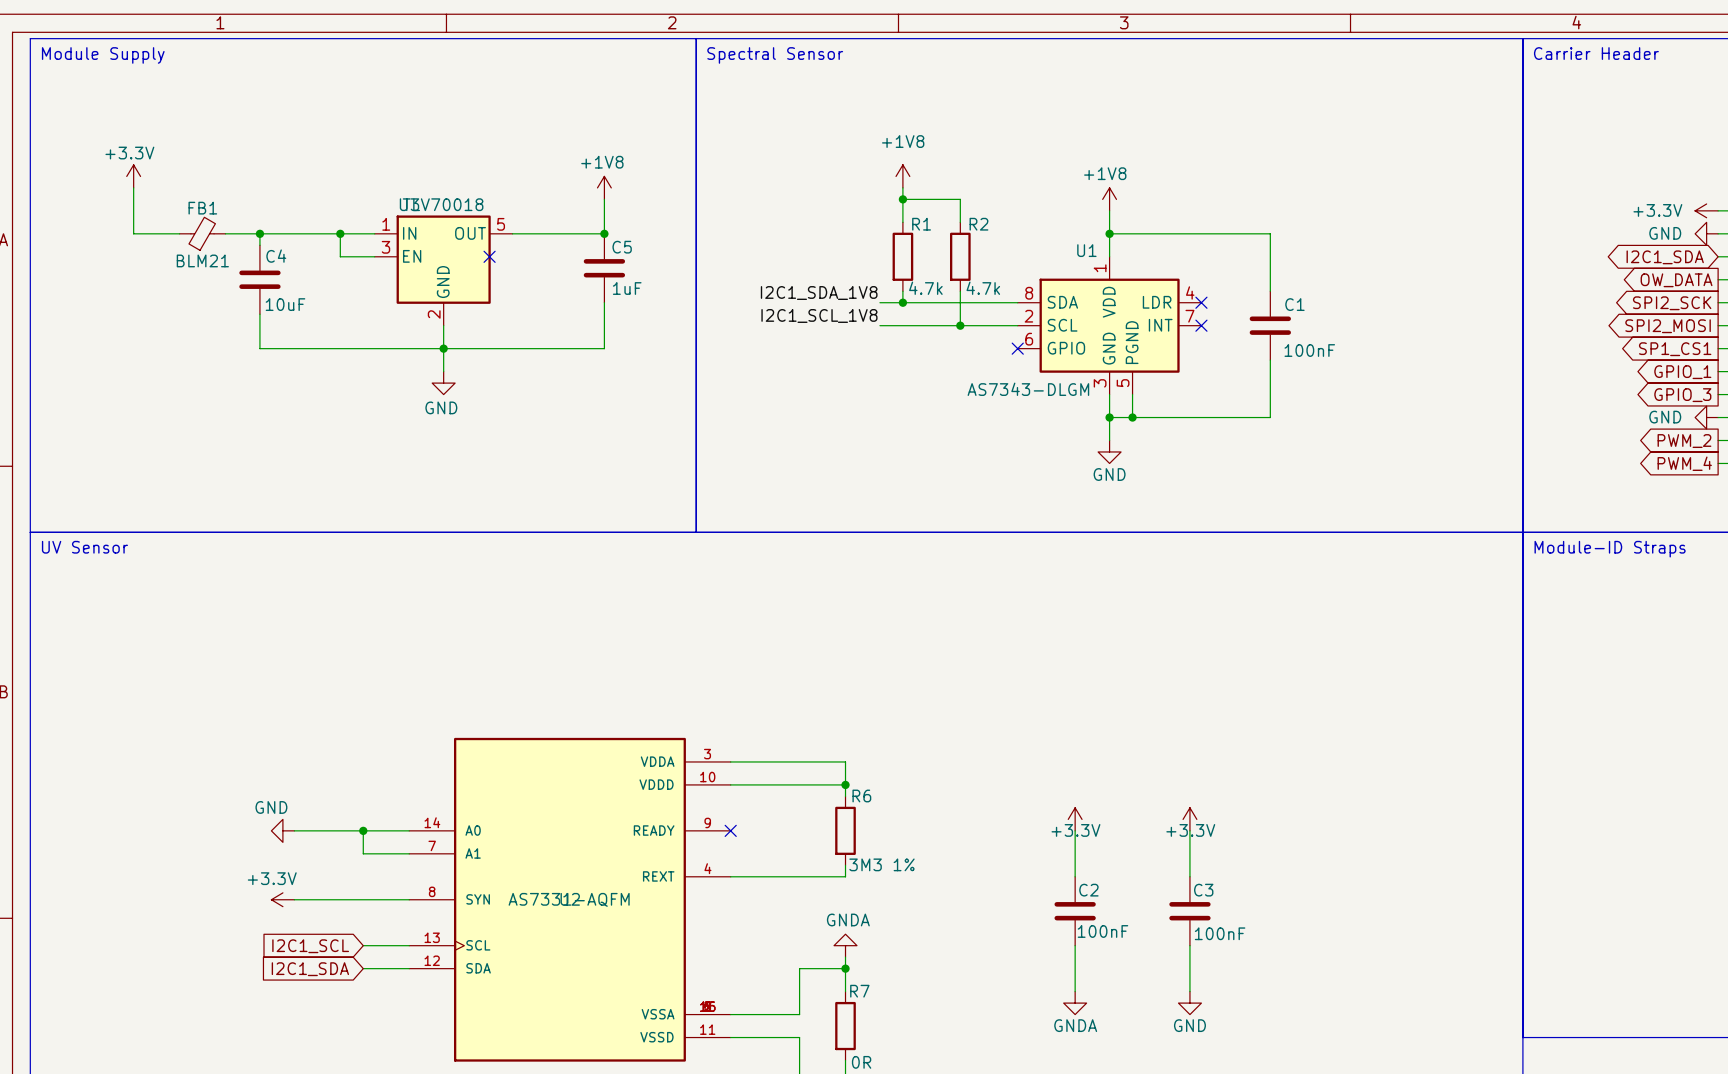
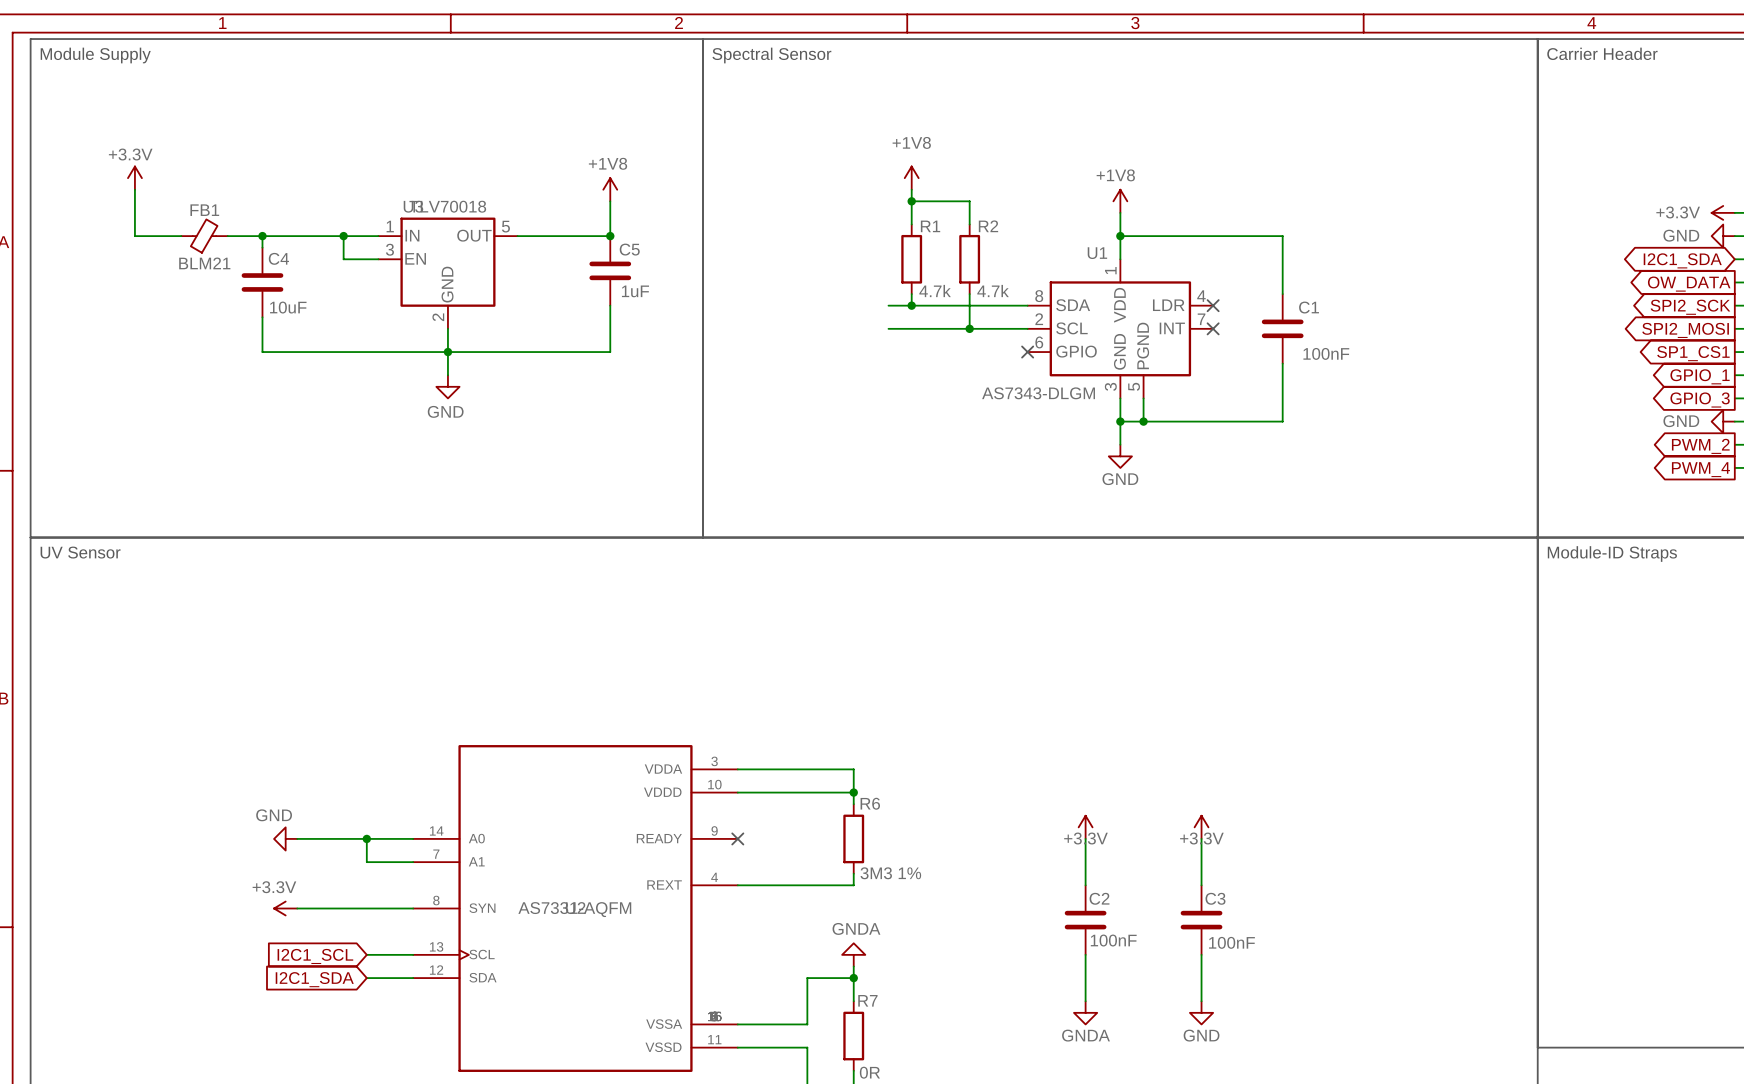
no-connect mark: (489, 256) -> none
label: I2C1_SDA_1V8 (819, 293) -> none
label: I2C1_SCL_1V8 (819, 315) -> none

